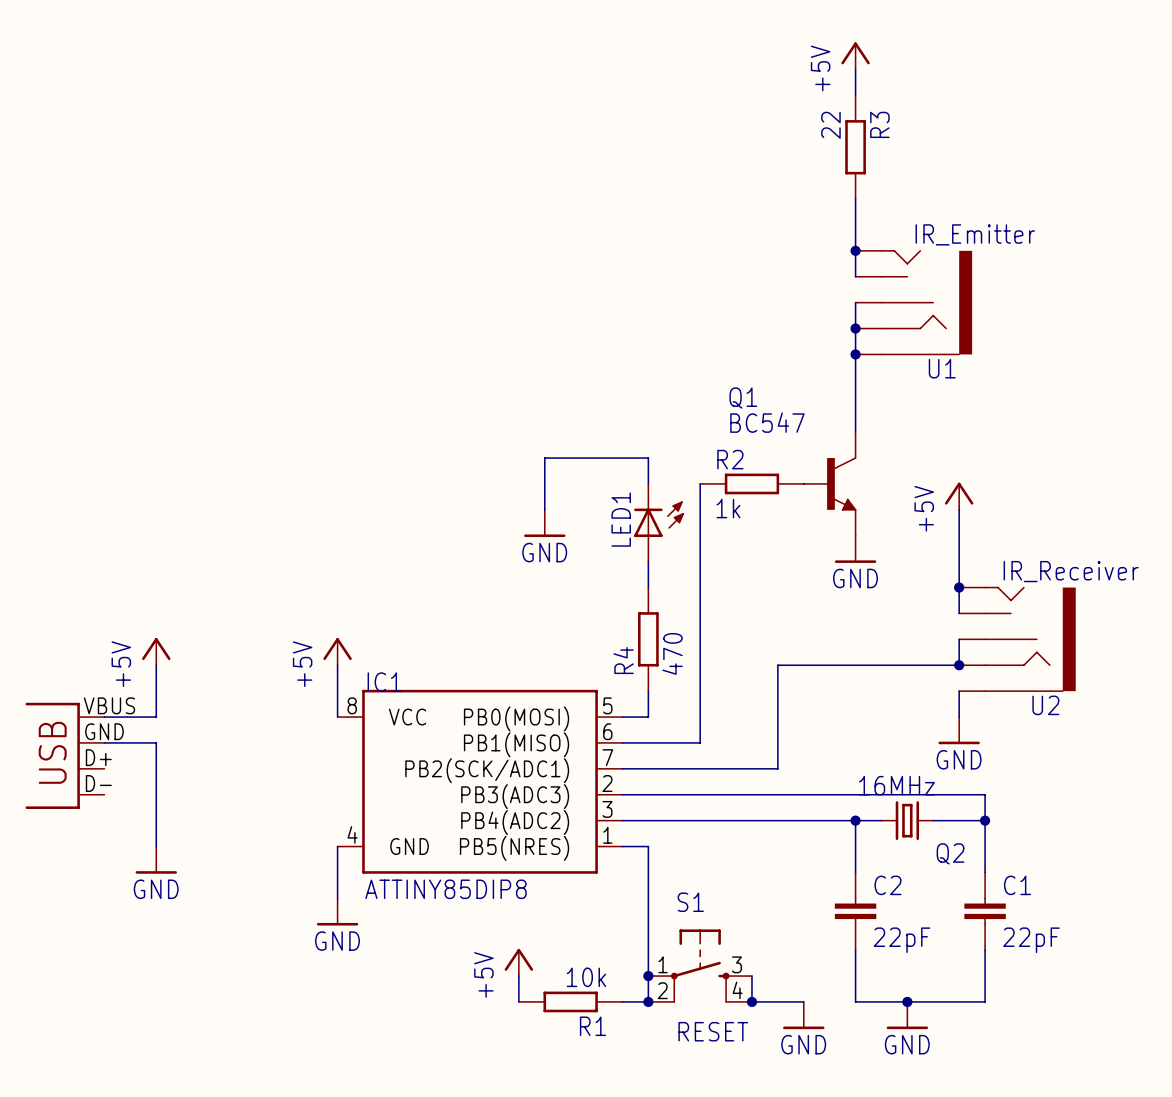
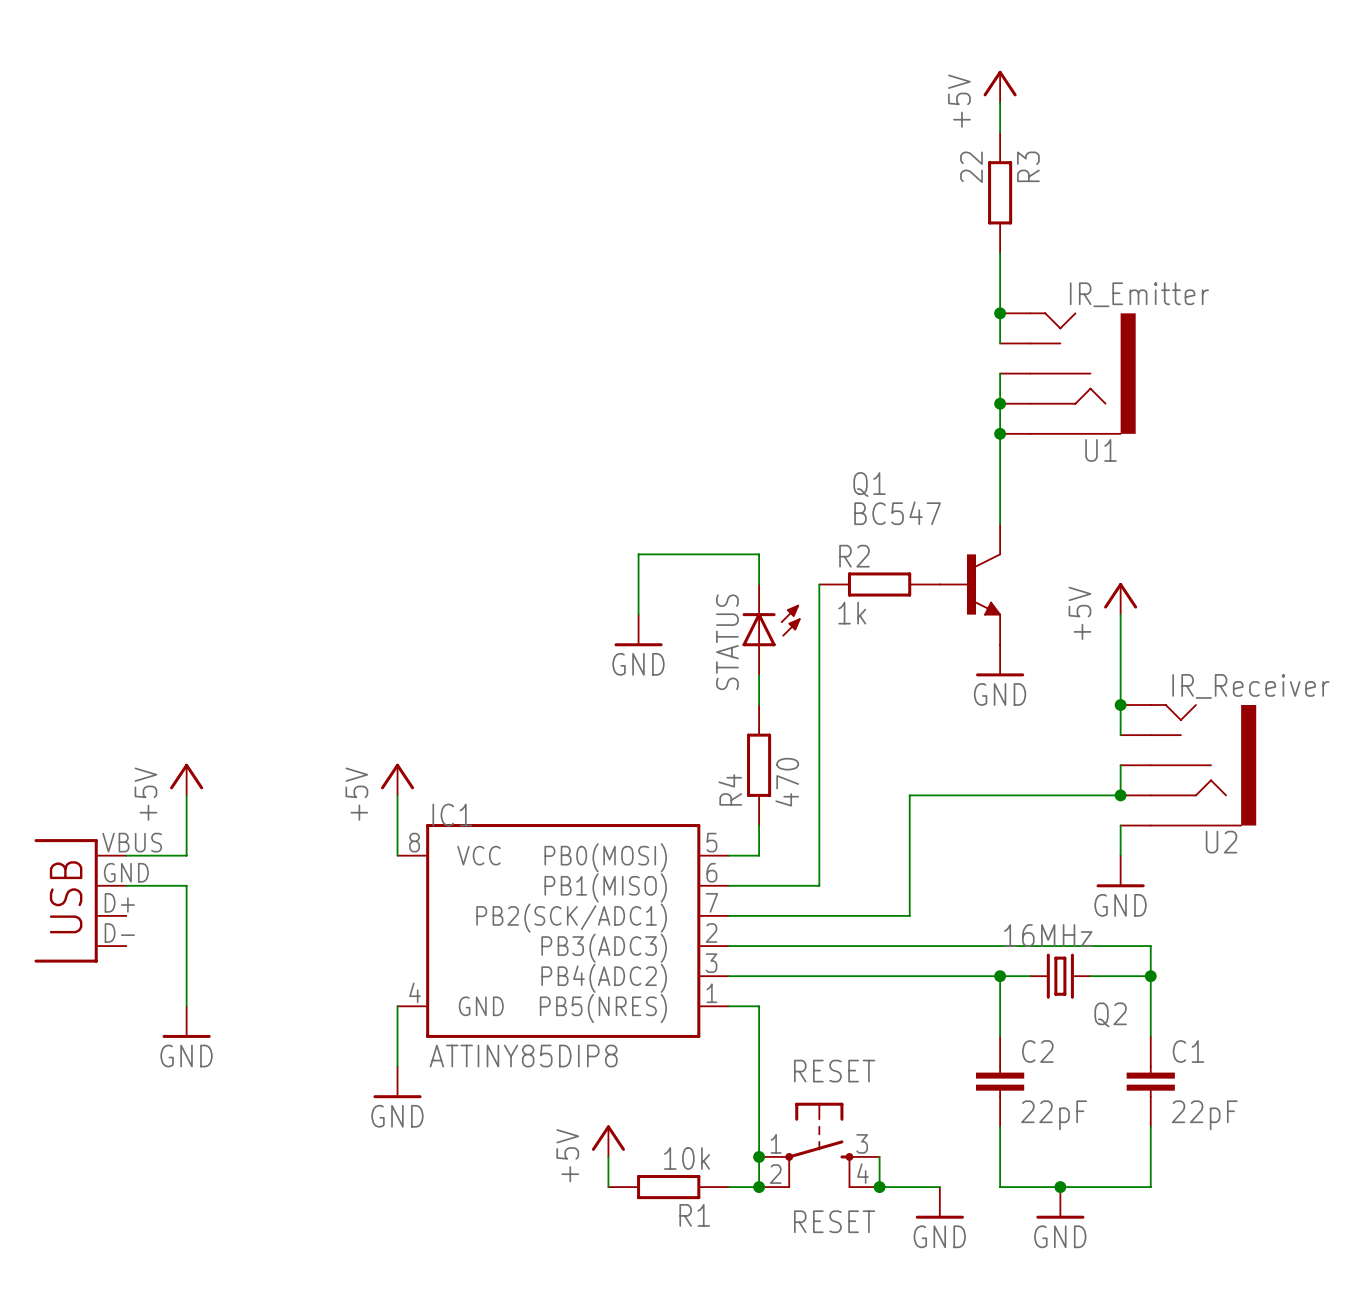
LED1 name: LED1 (621, 519) -> STATUS (727, 642)
S1 name: S1 (690, 902) -> RESET (834, 1071)

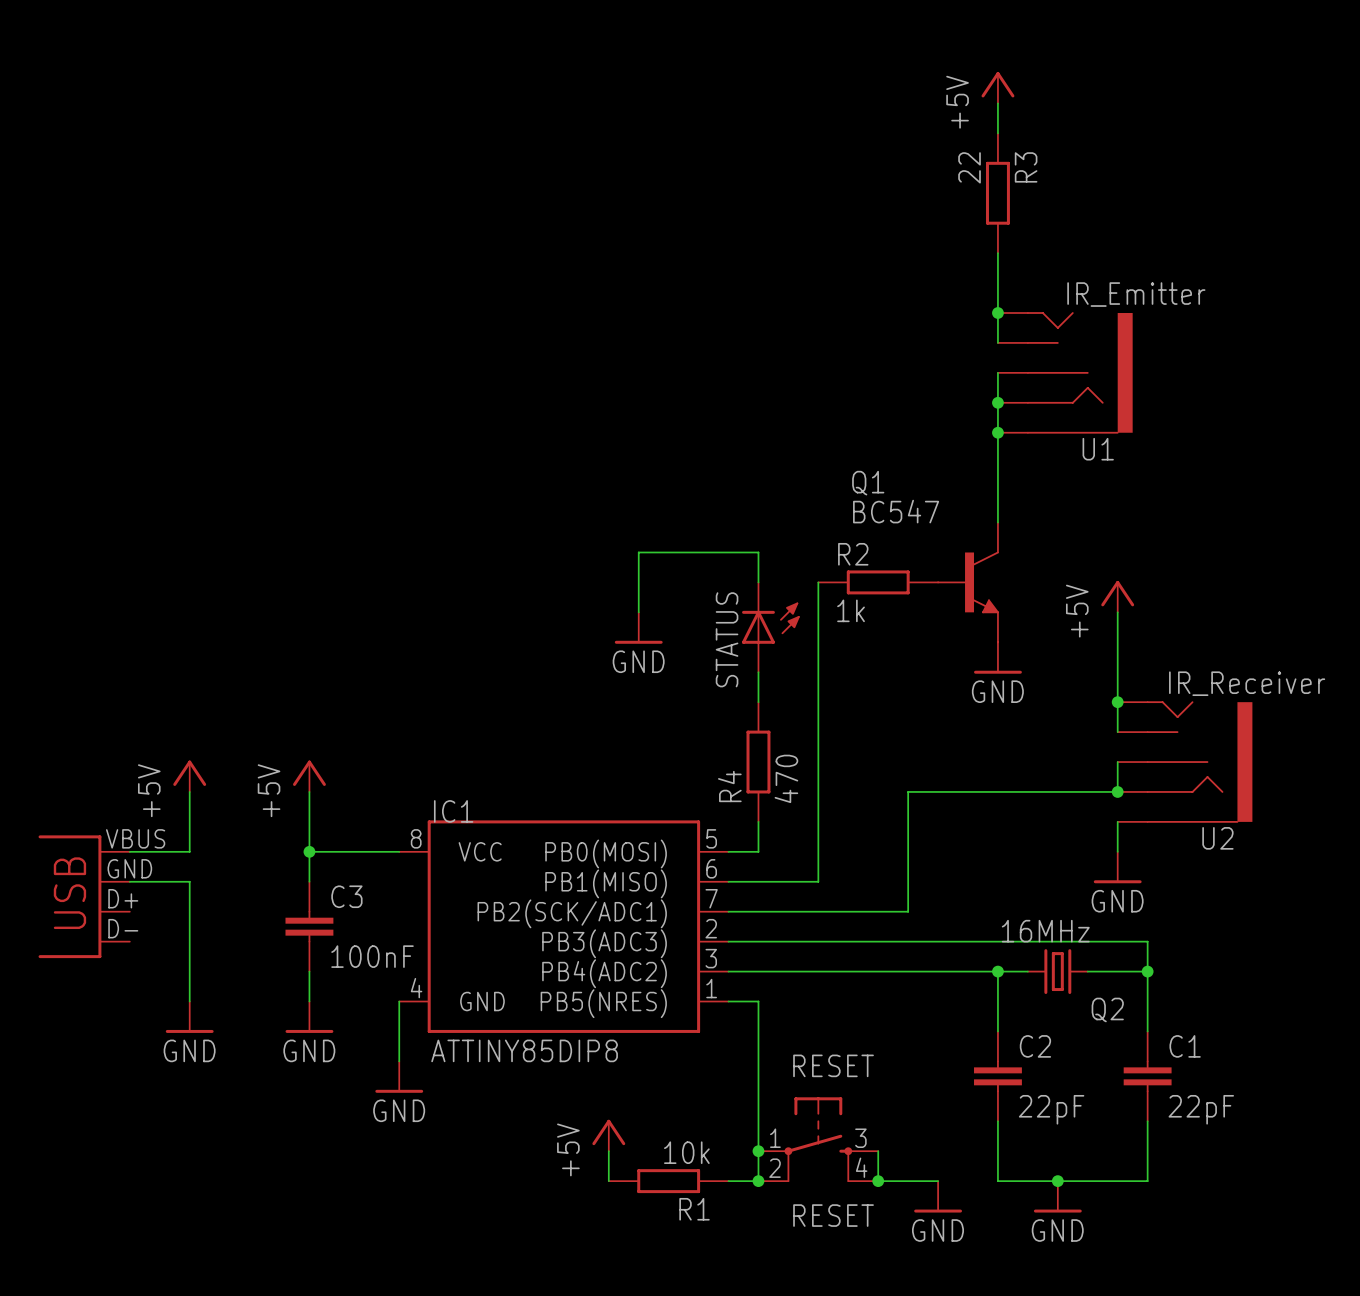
power symbol position: +5V (397, 779) -> +5V (309, 776)
wire: none -> (309, 791) (309, 881)
wire: (397, 795) (397, 855) -> (309, 851) (399, 851)
junction: none -> (309, 851)
C3: none -> 100nF (309, 926)
wire: none -> (309, 971) (309, 1001)
power symbol: none -> GND (309, 1017)

